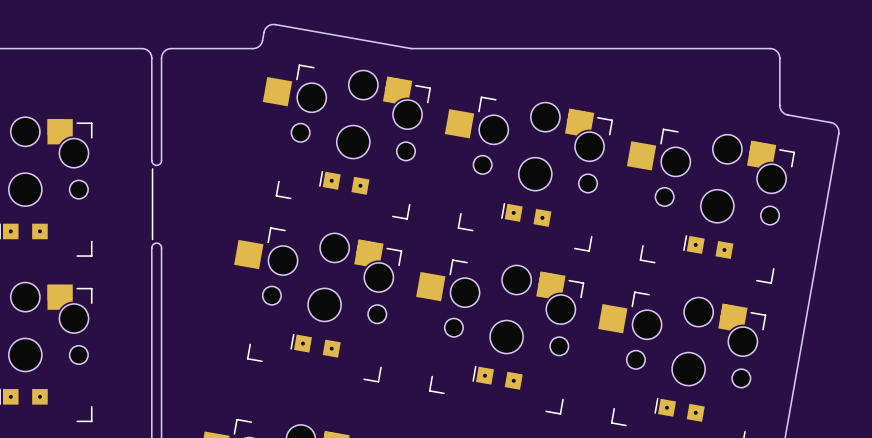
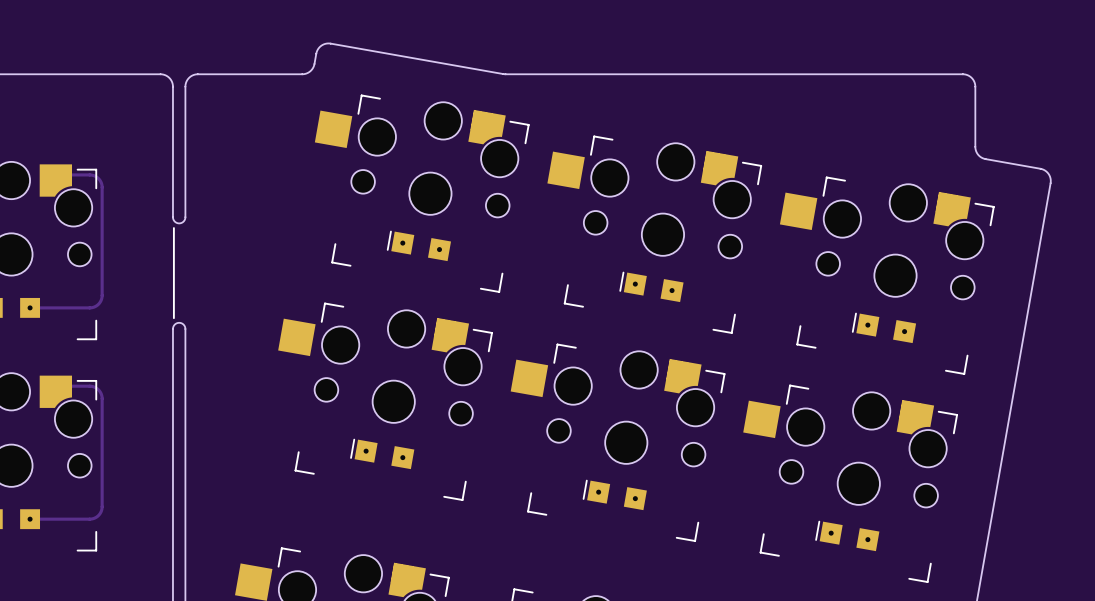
track: none -> (49, 174) (91, 175) (97, 177) (100, 181) (102, 296) (98, 304) (91, 307) (30, 307)
track: none -> (49, 386) (91, 386) (96, 388) (100, 393) (102, 508) (98, 515) (91, 519) (30, 519)

